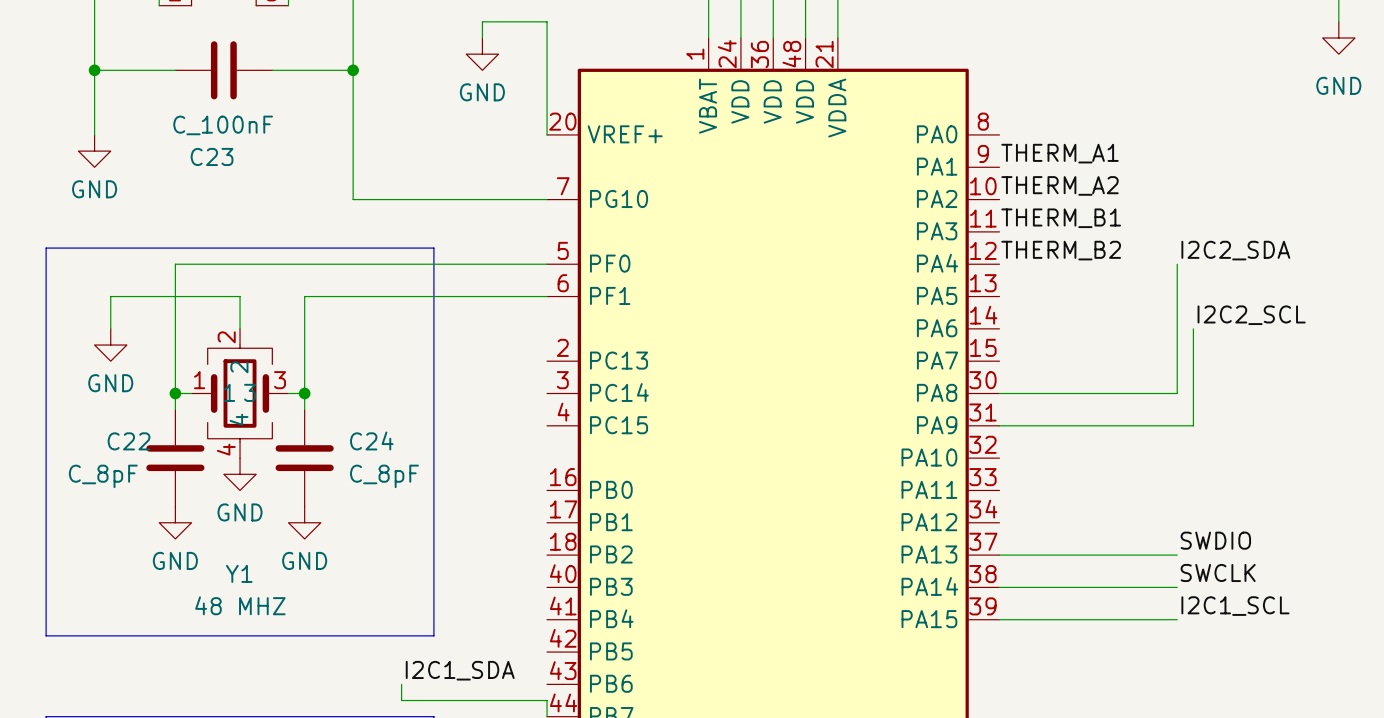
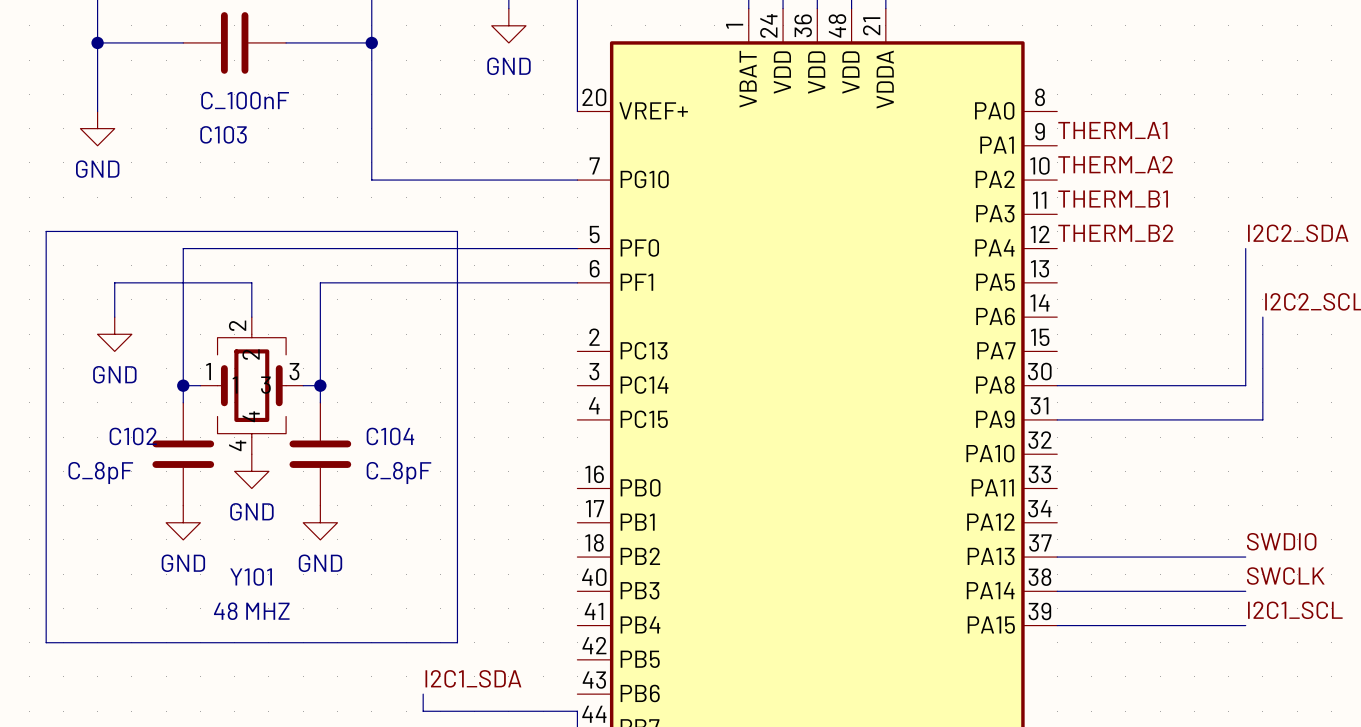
C23 name: C23 (212, 156) -> C103 (223, 134)
C24 name: C24 (371, 440) -> C104 (390, 436)
C22 name: C22 (129, 441) -> C102 (133, 436)
Y1 name: Y1 (239, 573) -> Y101 (251, 576)

